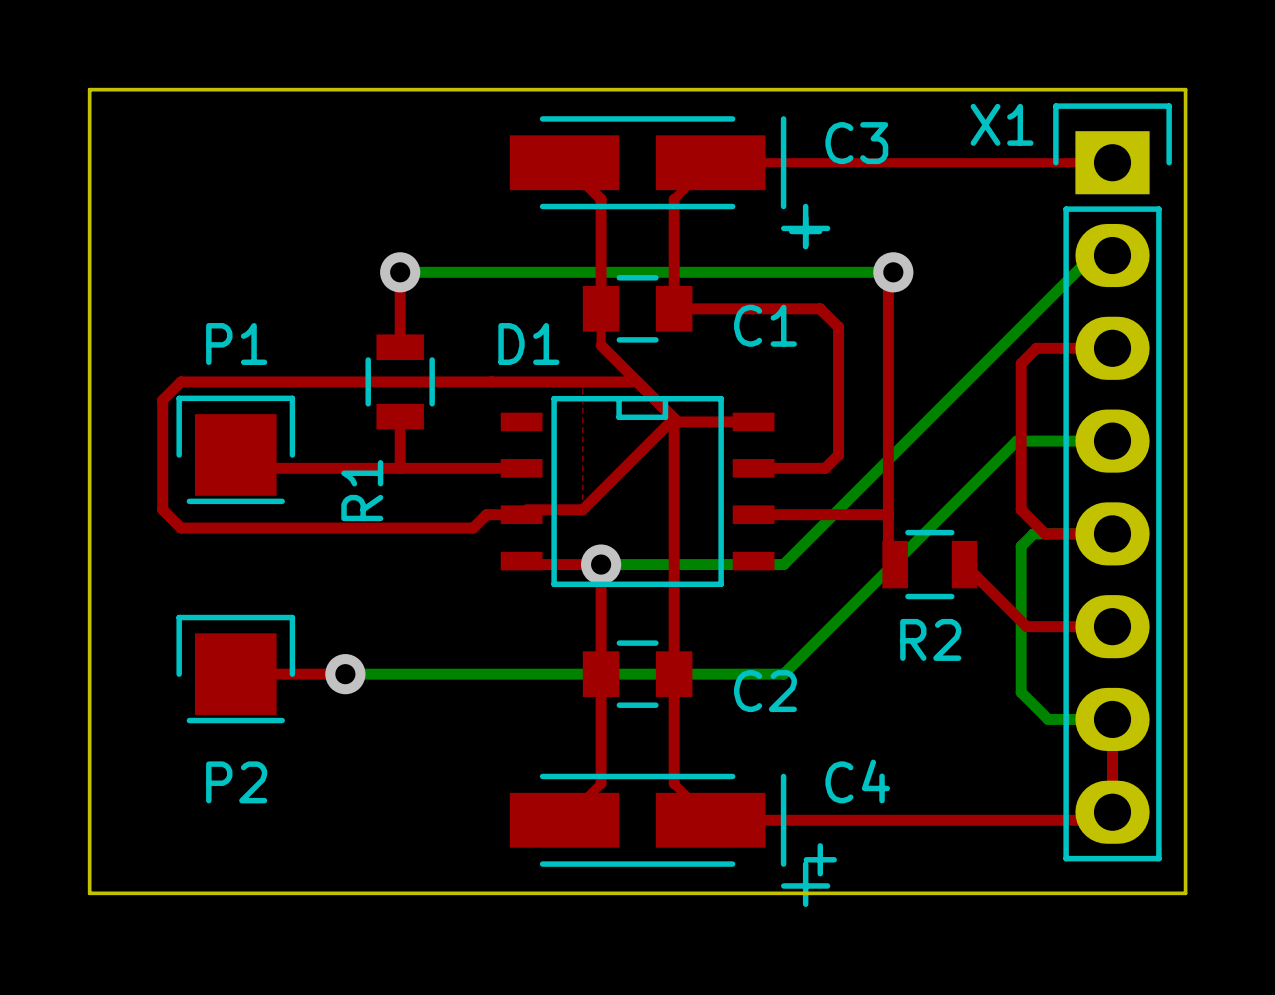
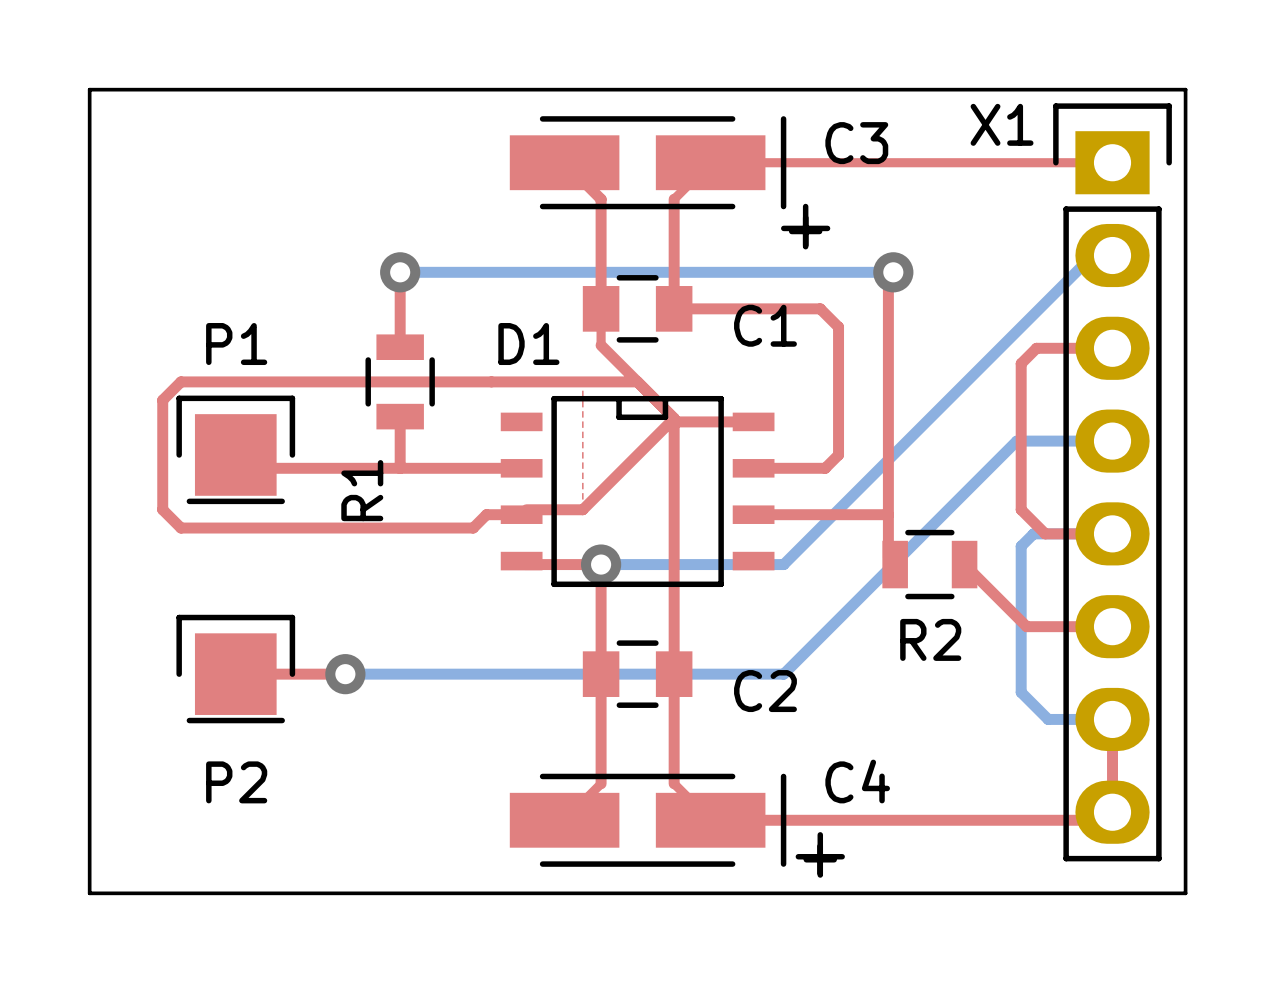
C4 footprint: [509, 773, 831, 907] -> [509, 773, 845, 878]

